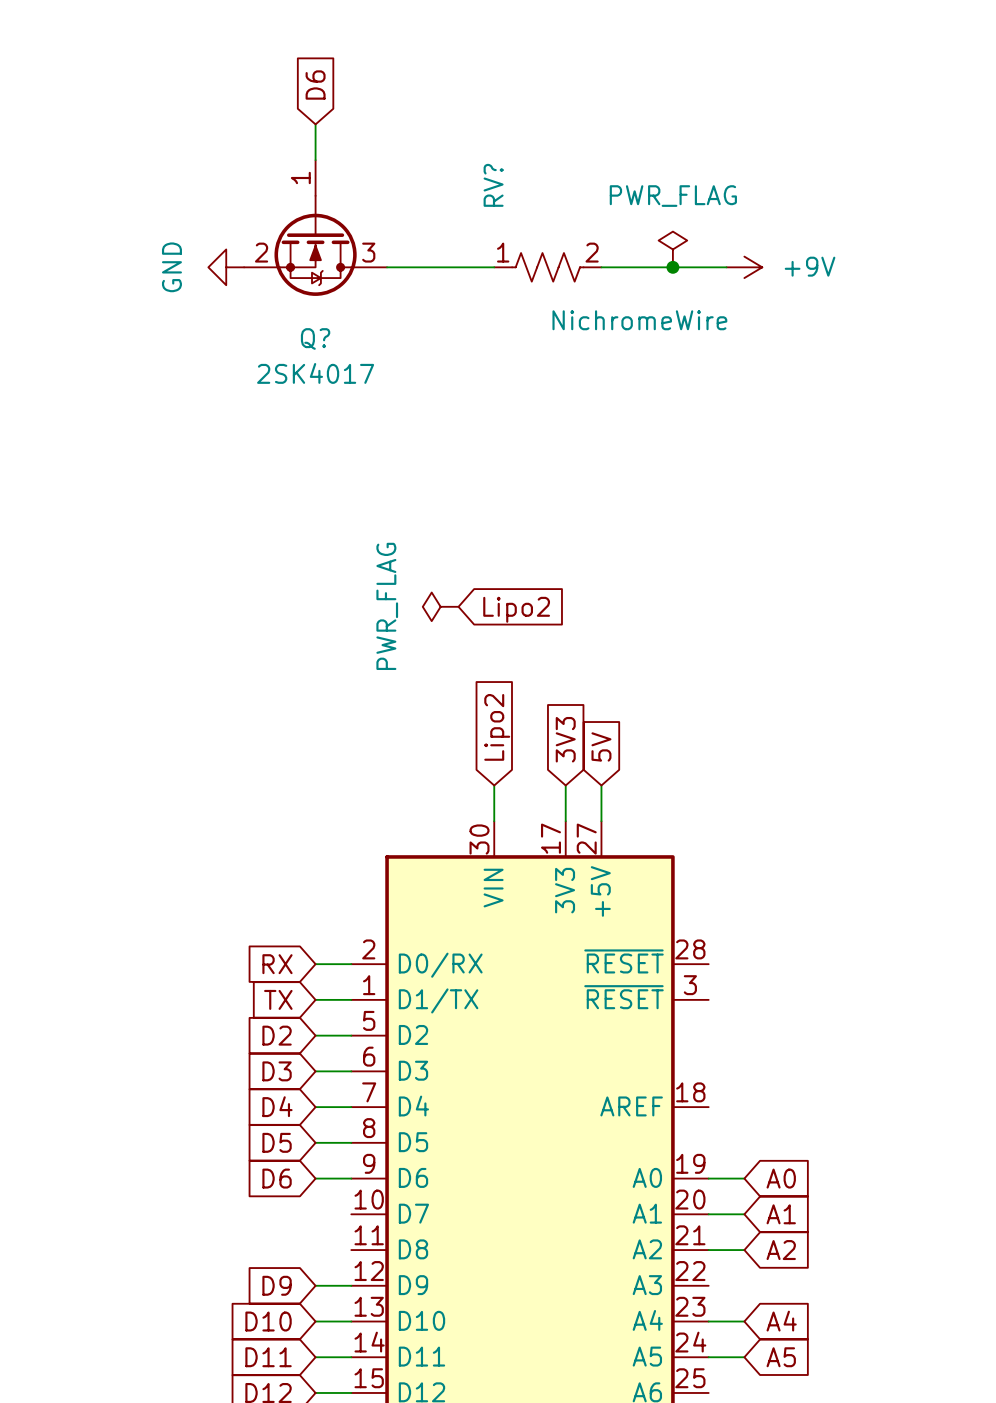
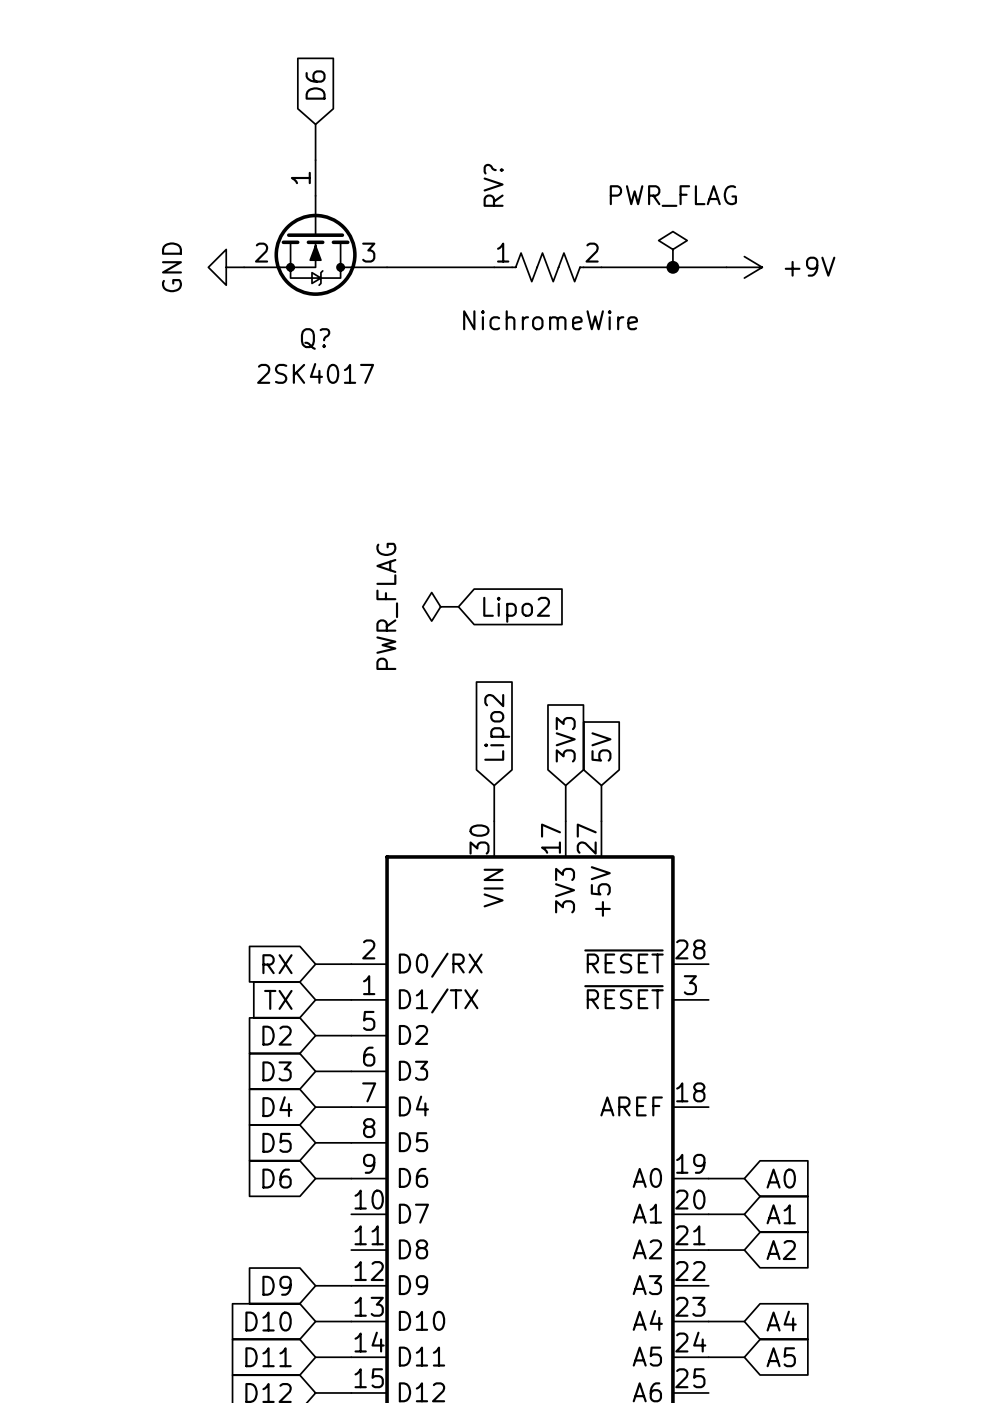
RV? value position: NichromeWire (639, 320) -> NichromeWire (550, 320)

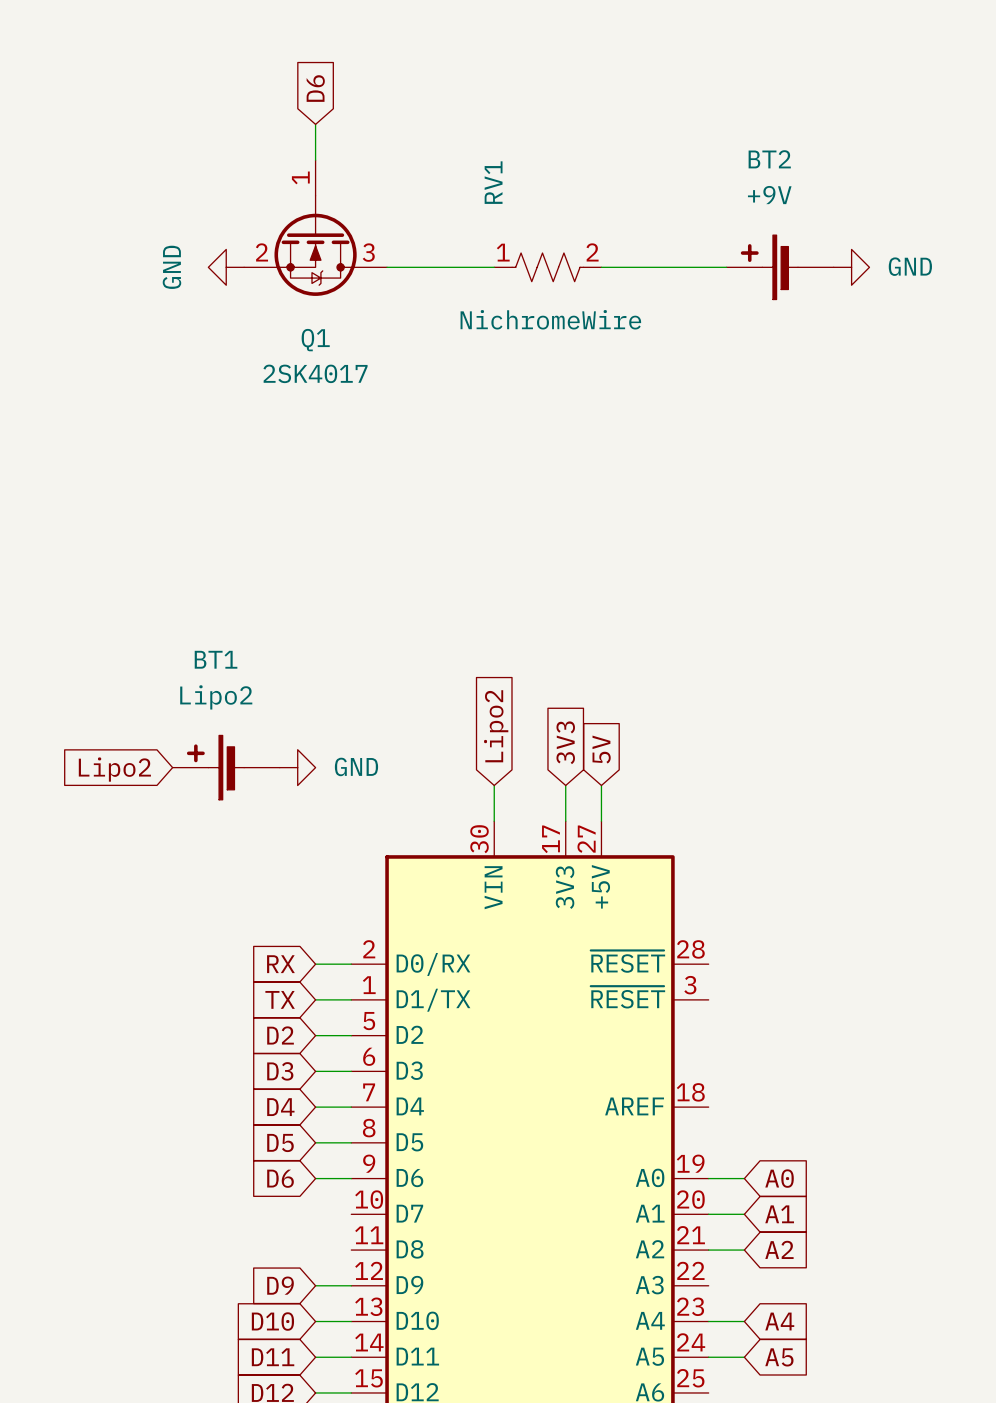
RV? name: RV? (493, 185) -> RV1 (493, 182)
power symbol: PWR_FLAG (672, 249) -> none
junction: (672, 267) -> none
power symbol: +9V (744, 267) -> none
BT2: none -> +9V (780, 267)
power symbol: none -> GND (851, 267)
Q? name: Q? (315, 338) -> Q1 (315, 340)
power symbol: PWR_FLAG (440, 606) -> none
global label rotation: 0° (516, 609) -> 180° (114, 769)
global label position: Lipo2 (516, 609) -> Lipo2 (114, 769)
BT1: none -> Lipo2 (226, 767)
power symbol: none -> GND (297, 767)

